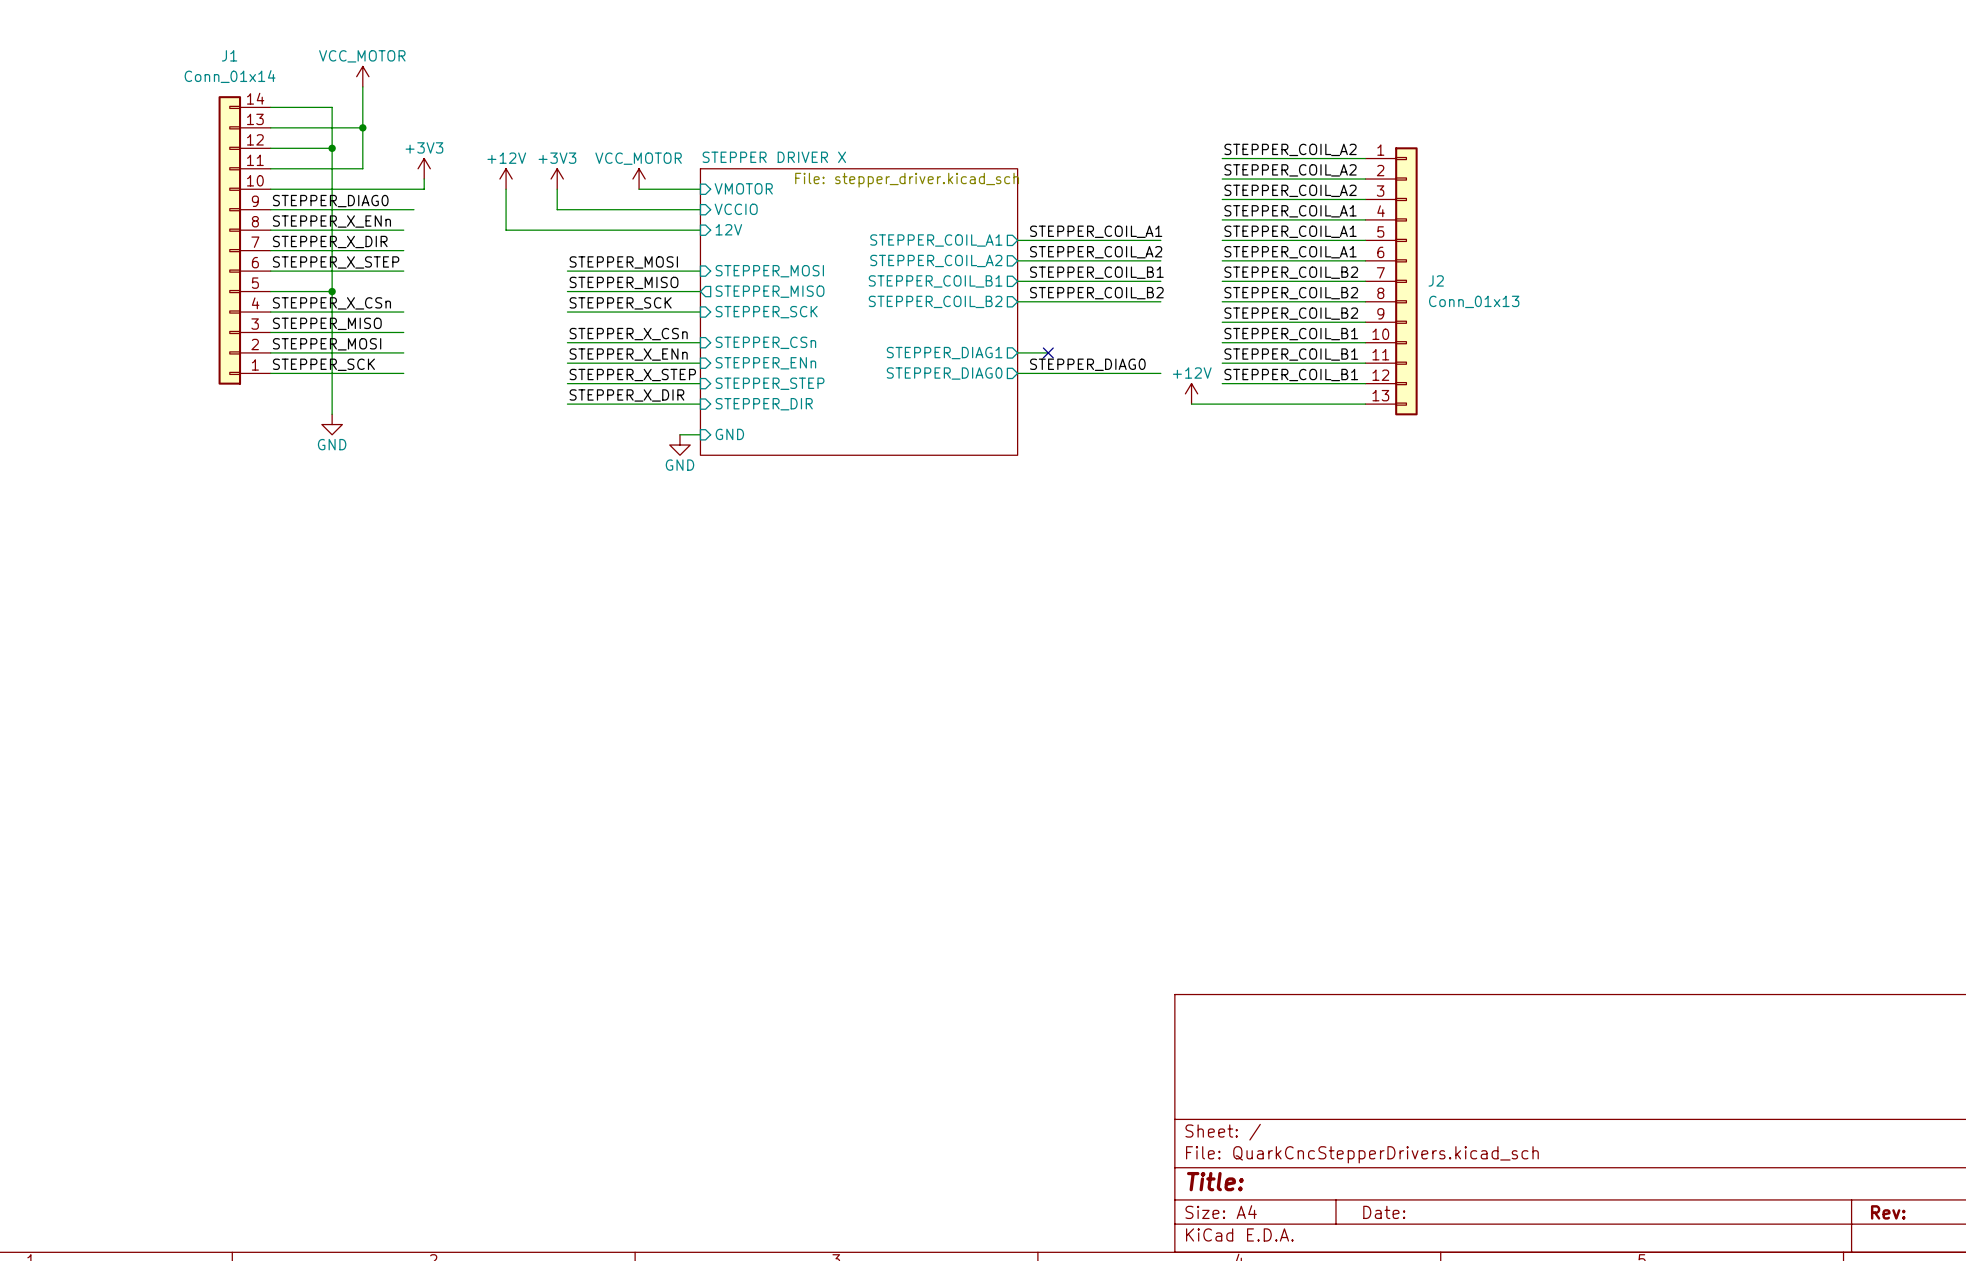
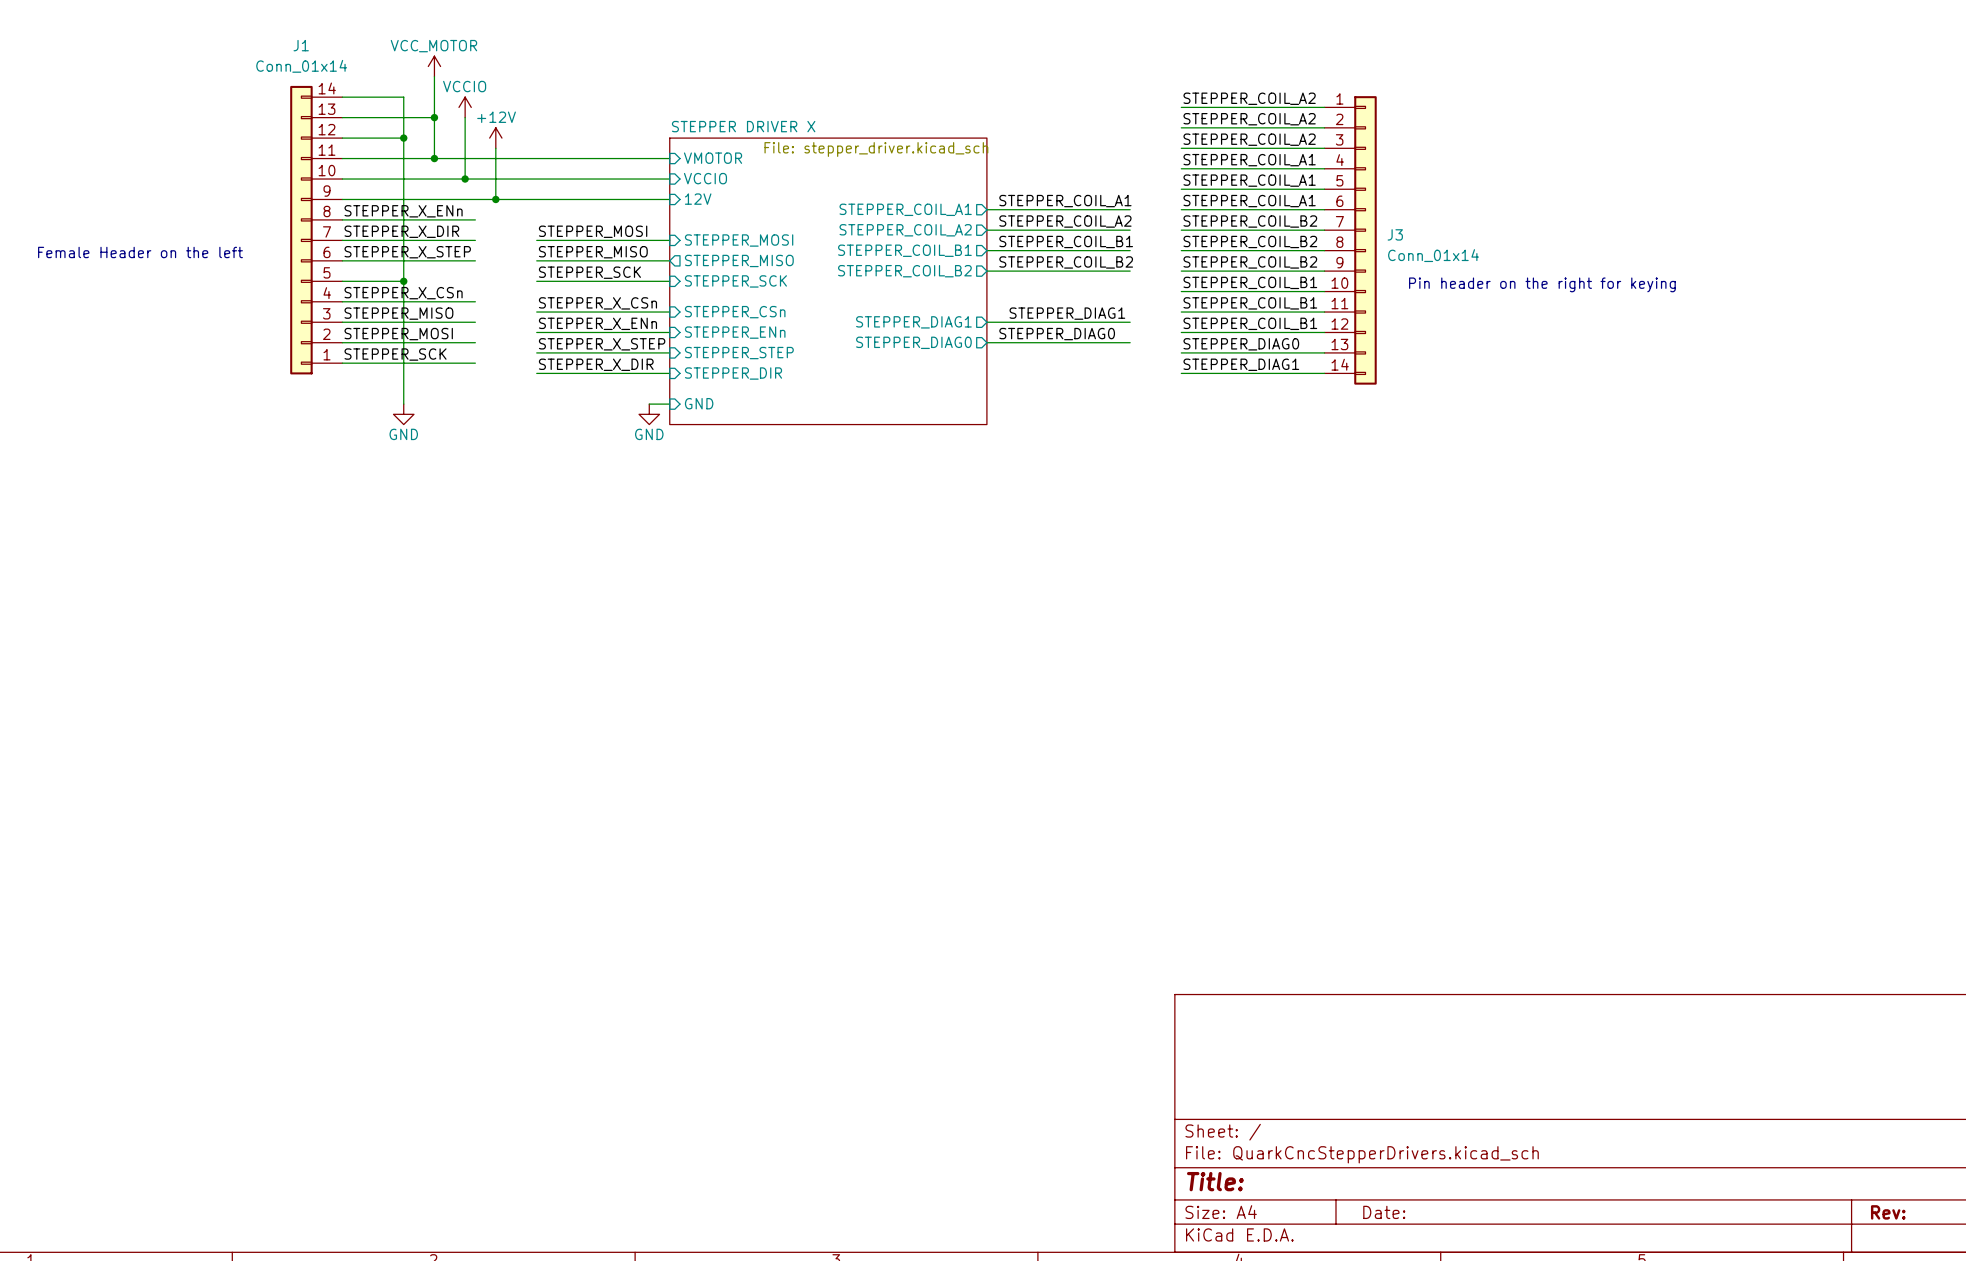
power symbol position: VCC_MOTOR (362, 76) -> VCC_MOTOR (434, 66)
wire: none -> (434, 76) (434, 158)
wire: (362, 86) (362, 168) (270, 168) -> none
label: none -> STEPPER_COIL_A2 (1249, 98)
wire: (270, 107) (332, 107) (332, 414) -> (342, 97) (403, 97) (403, 404)
power symbol: none -> VCCIO (465, 107)
wire: none -> (1181, 107) (1324, 107)
junction: none -> (434, 117)
wire: none -> (465, 117) (465, 179)
label: none -> STEPPER_COIL_A2 (1249, 119)
wire: (270, 127) (362, 127) -> (342, 117) (434, 117)
junction: (362, 127) -> none
wire: none -> (1181, 127) (1324, 127)
junction: none -> (403, 138)
label: none -> STEPPER_COIL_A2 (1249, 139)
wire: (270, 148) (332, 148) -> (342, 138) (403, 138)
junction: (332, 148) -> none
wire: none -> (495, 148) (495, 199)
label: STEPPER_COIL_A2 (1290, 149) -> none
wire: none -> (342, 158) (669, 158)
junction: none -> (434, 158)
wire: (1222, 158) (1365, 158) -> (1181, 148) (1324, 148)
label: none -> STEPPER_COIL_A1 (1249, 160)
power symbol: +3V3 (424, 168) -> none
label: STEPPER_COIL_A2 (1290, 170) -> none
wire: none -> (342, 179) (669, 179)
wire: (424, 179) (424, 189) (270, 189) -> none
junction: none -> (465, 179)
power symbol position: +12V (506, 179) -> +12V (495, 138)
power symbol: +3V3 (557, 179) -> none
power symbol: VCC_MOTOR (639, 179) -> none
wire: (1222, 179) (1365, 179) -> (1181, 168) (1324, 168)
label: none -> STEPPER_COIL_A1 (1249, 180)
sheet pin position: VMOTOR (743, 188) -> VMOTOR (713, 158)
wire: (506, 189) (506, 230) (700, 230) -> none
wire: (557, 189) (557, 209) (700, 209) -> none
wire: (639, 189) (700, 189) -> none
label: STEPPER_COIL_A2 (1290, 190) -> none
wire: none -> (342, 199) (669, 199)
junction: none -> (495, 199)
wire: (1222, 199) (1365, 199) -> (1181, 189) (1324, 189)
label: STEPPER_DIAG0 (330, 201) -> none
label: none -> STEPPER_COIL_A1 (1249, 201)
wire: (270, 209) (413, 209) -> none
sheet pin position: VCCIO (736, 209) -> VCCIO (705, 178)
label: STEPPER_COIL_A1 (1290, 211) -> none
wire: (1222, 219) (1365, 219) -> (1181, 209) (1324, 209)
label position: STEPPER_X_ENn (331, 221) -> STEPPER_X_ENn (403, 211)
label: none -> STEPPER_COIL_B2 (1250, 221)
sheet pin position: 12V (728, 229) -> 12V (698, 199)
wire: (270, 230) (403, 230) -> (342, 219) (475, 219)
label position: STEPPER_COIL_A1 (1096, 231) -> STEPPER_COIL_A1 (1065, 201)
label: STEPPER_COIL_A1 (1290, 231) -> none
J1 position: (244, 240) -> (316, 230)
sheet pin position: STEPPER_COIL_A1 (936, 240) -> STEPPER_COIL_A1 (905, 209)
wire: (1017, 240) (1160, 240) -> (986, 209) (1130, 209)
wire: (1222, 240) (1365, 240) -> (1181, 230) (1324, 230)
J3: none -> Conn_01x14 (1350, 240)
label position: STEPPER_X_DIR (330, 241) -> STEPPER_X_DIR (401, 231)
label: none -> STEPPER_COIL_B2 (1250, 241)
wire: (270, 250) (403, 250) -> (342, 240) (475, 240)
text: none -> Female Header on the left (140, 252)
label position: STEPPER_COIL_A2 (1096, 252) -> STEPPER_COIL_A2 (1065, 221)
label: STEPPER_COIL_A1 (1290, 252) -> none
sheet pin position: STEPPER_COIL_A2 (936, 260) -> STEPPER_COIL_A2 (905, 230)
wire: (1017, 260) (1160, 260) -> (986, 230) (1130, 230)
wire: (1222, 260) (1365, 260) -> (1181, 250) (1324, 250)
label position: STEPPER_X_STEP (336, 262) -> STEPPER_X_STEP (407, 252)
label position: STEPPER_MOSI (623, 262) -> STEPPER_MOSI (593, 231)
label: none -> STEPPER_COIL_B2 (1250, 262)
wire: (270, 271) (403, 271) -> (342, 260) (475, 260)
wire: (567, 271) (700, 271) -> (536, 240) (669, 240)
sheet pin position: STEPPER_MOSI (769, 271) -> STEPPER_MOSI (739, 240)
label position: STEPPER_COIL_B1 (1096, 272) -> STEPPER_COIL_B1 (1066, 241)
label: STEPPER_COIL_B2 (1291, 272) -> none
junction: none -> (403, 281)
wire: none -> (536, 281) (669, 281)
sheet pin position: STEPPER_COIL_B1 (935, 281) -> STEPPER_COIL_B1 (904, 250)
wire: (1017, 281) (1160, 281) -> (986, 250) (1130, 250)
wire: (1222, 281) (1365, 281) -> (1181, 271) (1324, 271)
J2: Conn_01x13 (1391, 281) -> none
label position: STEPPER_MISO (624, 282) -> STEPPER_MISO (593, 252)
label: none -> STEPPER_COIL_B1 (1250, 282)
text: none -> Pin header on the right for keying (1542, 284)
wire: (270, 291) (332, 291) -> (342, 281) (403, 281)
junction: (332, 291) -> none
wire: (567, 291) (700, 291) -> (536, 260) (669, 260)
sheet pin position: STEPPER_MISO (770, 291) -> STEPPER_MISO (739, 260)
label position: STEPPER_COIL_B2 (1096, 293) -> STEPPER_COIL_B2 (1066, 262)
label: STEPPER_COIL_B2 (1291, 293) -> none
sheet pin position: STEPPER_COIL_B2 (935, 301) -> STEPPER_COIL_B2 (904, 271)
wire: (1017, 301) (1160, 301) -> (986, 271) (1130, 271)
wire: (1222, 301) (1365, 301) -> (1181, 291) (1324, 291)
label position: STEPPER_X_CSn (331, 303) -> STEPPER_X_CSn (403, 293)
label position: STEPPER_SCK (620, 303) -> STEPPER_SCK (589, 272)
label: none -> STEPPER_COIL_B1 (1250, 303)
wire: (270, 312) (403, 312) -> (342, 301) (475, 301)
wire: (669, 312) (700, 312) -> (536, 312) (567, 312)
sheet pin position: STEPPER_SCK (766, 312) -> STEPPER_SCK (735, 281)
sheet STEPPER DRIVER X position: (859, 312) -> (828, 281)
label: none -> STEPPER_DIAG1 (1067, 313)
label: STEPPER_COIL_B2 (1291, 313) -> none
wire: none -> (986, 322) (1130, 322)
wire: (1222, 322) (1365, 322) -> (1181, 312) (1324, 312)
label position: STEPPER_MISO (327, 323) -> STEPPER_MISO (398, 313)
label: none -> STEPPER_COIL_B1 (1250, 323)
wire: (270, 332) (403, 332) -> (342, 322) (475, 322)
label position: STEPPER_X_CSn (628, 334) -> STEPPER_X_CSn (597, 303)
label: STEPPER_COIL_B1 (1291, 334) -> none
wire: (567, 342) (700, 342) -> (536, 373) (669, 373)
sheet pin position: STEPPER_CSn (765, 342) -> STEPPER_CSn (735, 312)
wire: (1222, 342) (1365, 342) -> (1181, 332) (1324, 332)
label position: STEPPER_MOSI (327, 344) -> STEPPER_MOSI (398, 334)
label: none -> STEPPER_DIAG0 (1241, 344)
wire: (270, 352) (403, 352) -> (342, 342) (475, 342)
wire: (1017, 352) (1048, 352) -> none
no-connect mark: (1048, 352) -> none
sheet pin position: STEPPER_DIAG1 (944, 353) -> STEPPER_DIAG1 (913, 322)
label position: STEPPER_X_ENn (628, 354) -> STEPPER_X_ENn (597, 323)
label: STEPPER_COIL_B1 (1291, 354) -> none
wire: (567, 363) (700, 363) -> (536, 332) (669, 332)
sheet pin position: STEPPER_ENn (765, 363) -> STEPPER_ENn (735, 332)
wire: (1222, 363) (1365, 363) -> (1181, 352) (1324, 352)
label position: STEPPER_SCK (323, 364) -> STEPPER_SCK (395, 354)
label position: STEPPER_DIAG0 (1087, 364) -> STEPPER_DIAG0 (1057, 334)
label: none -> STEPPER_DIAG1 (1241, 364)
wire: (270, 373) (403, 373) -> (342, 363) (475, 363)
sheet pin position: STEPPER_DIAG0 (944, 373) -> STEPPER_DIAG0 (913, 342)
wire: (1017, 373) (1160, 373) -> (986, 342) (1130, 342)
label position: STEPPER_X_STEP (632, 374) -> STEPPER_X_STEP (602, 344)
label: STEPPER_COIL_B1 (1291, 374) -> none
wire: (567, 383) (700, 383) -> (536, 352) (669, 352)
sheet pin position: STEPPER_STEP (770, 383) -> STEPPER_STEP (739, 353)
wire: (1222, 383) (1365, 383) -> (1181, 373) (1324, 373)
power symbol: +12V (1191, 393) -> none
label position: STEPPER_X_DIR (626, 395) -> STEPPER_X_DIR (596, 364)
wire: (567, 404) (649, 404) -> none
wire: (669, 404) (700, 404) -> none
sheet pin position: STEPPER_DIR (764, 404) -> STEPPER_DIR (733, 373)
wire: (1191, 404) (1365, 404) -> none
power symbol position: GND (332, 424) -> GND (403, 414)
wire: (679, 434) (700, 434) -> none
sheet pin position: GND (729, 434) -> GND (699, 403)
power symbol position: GND (679, 445) -> GND (649, 414)

